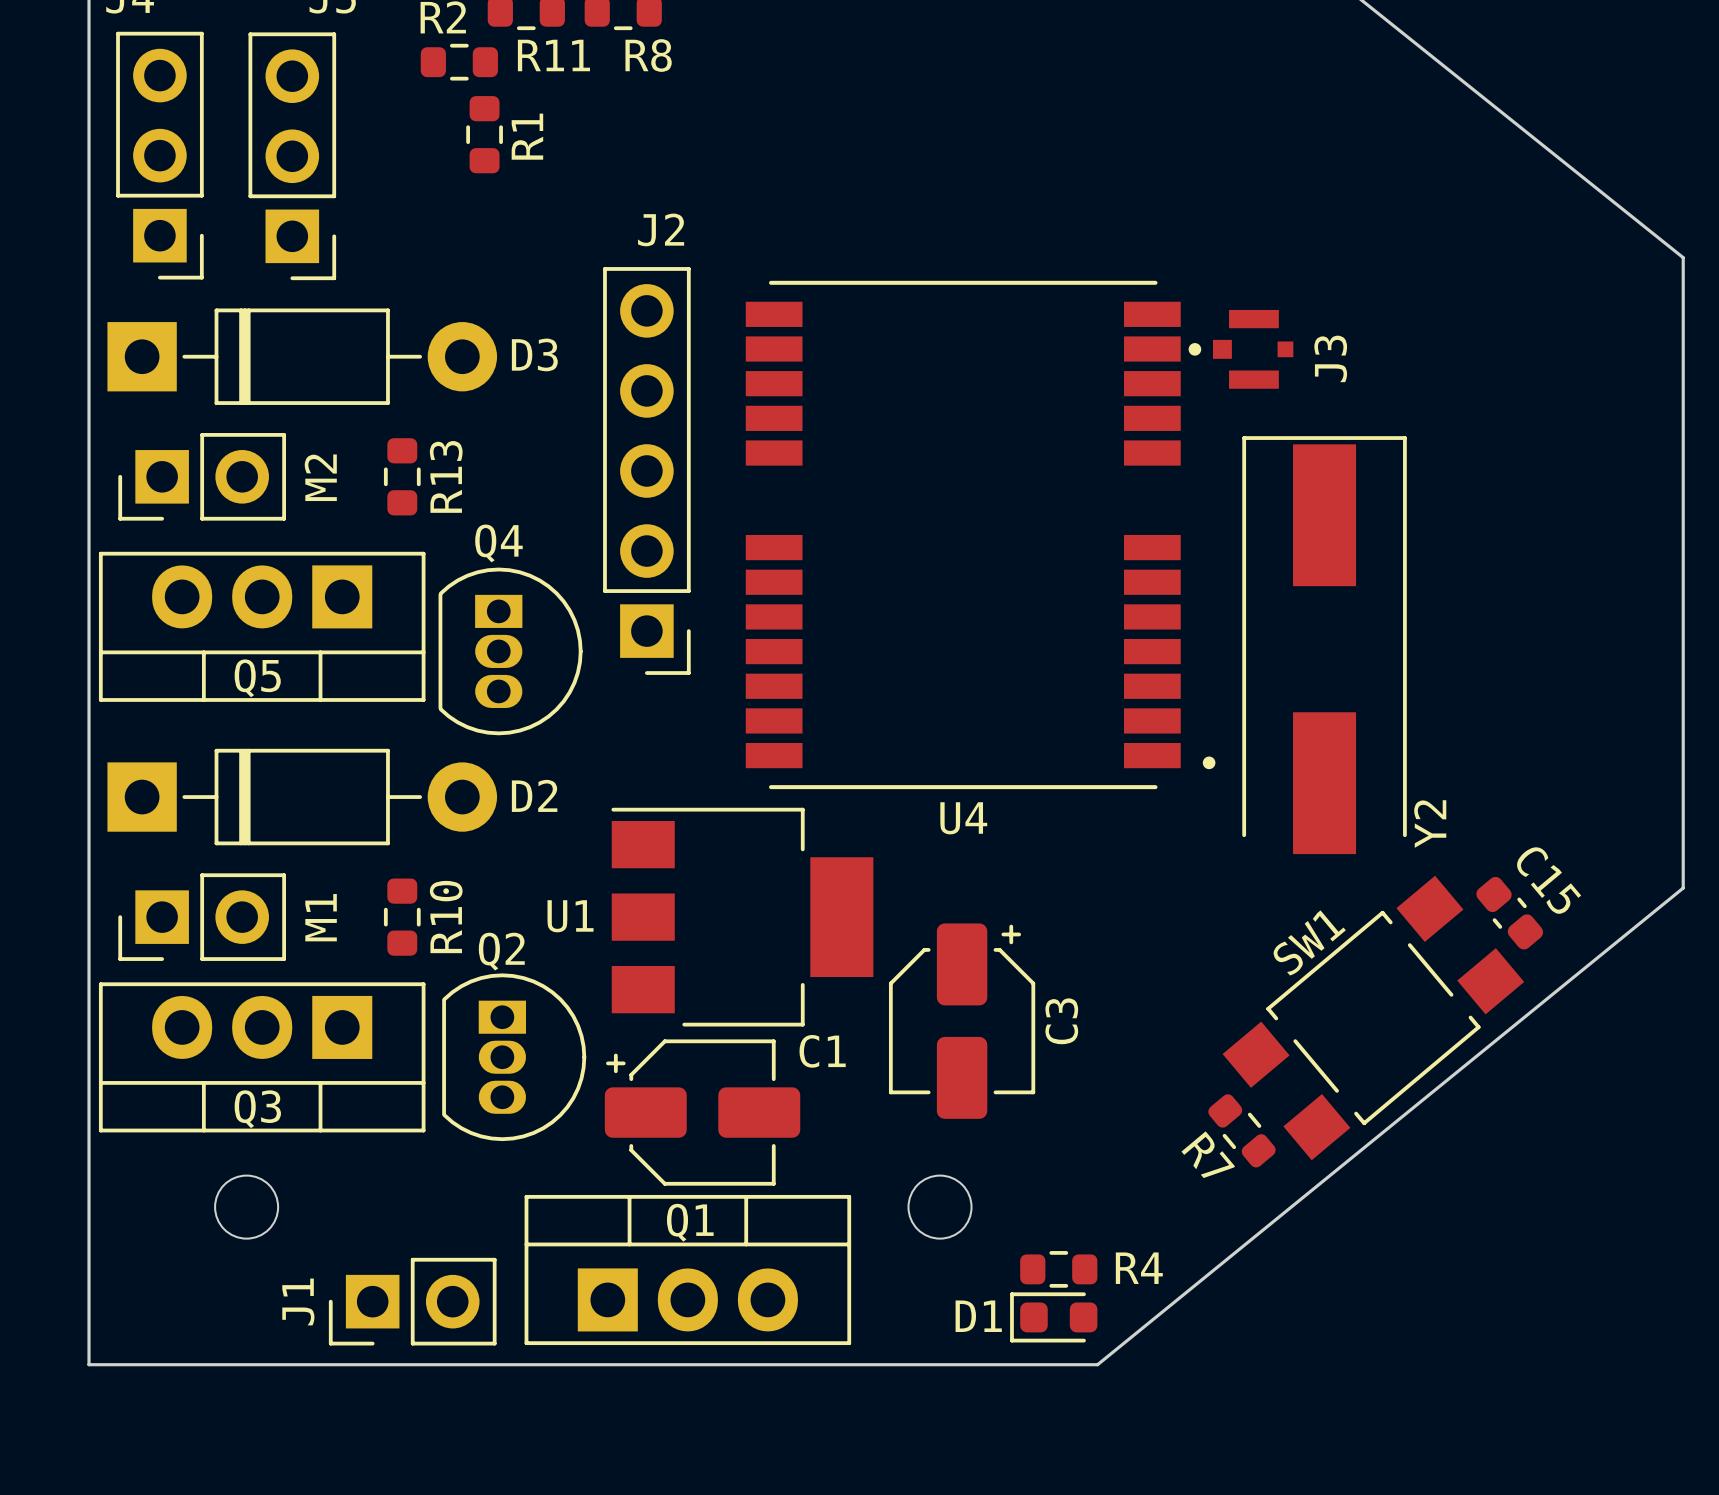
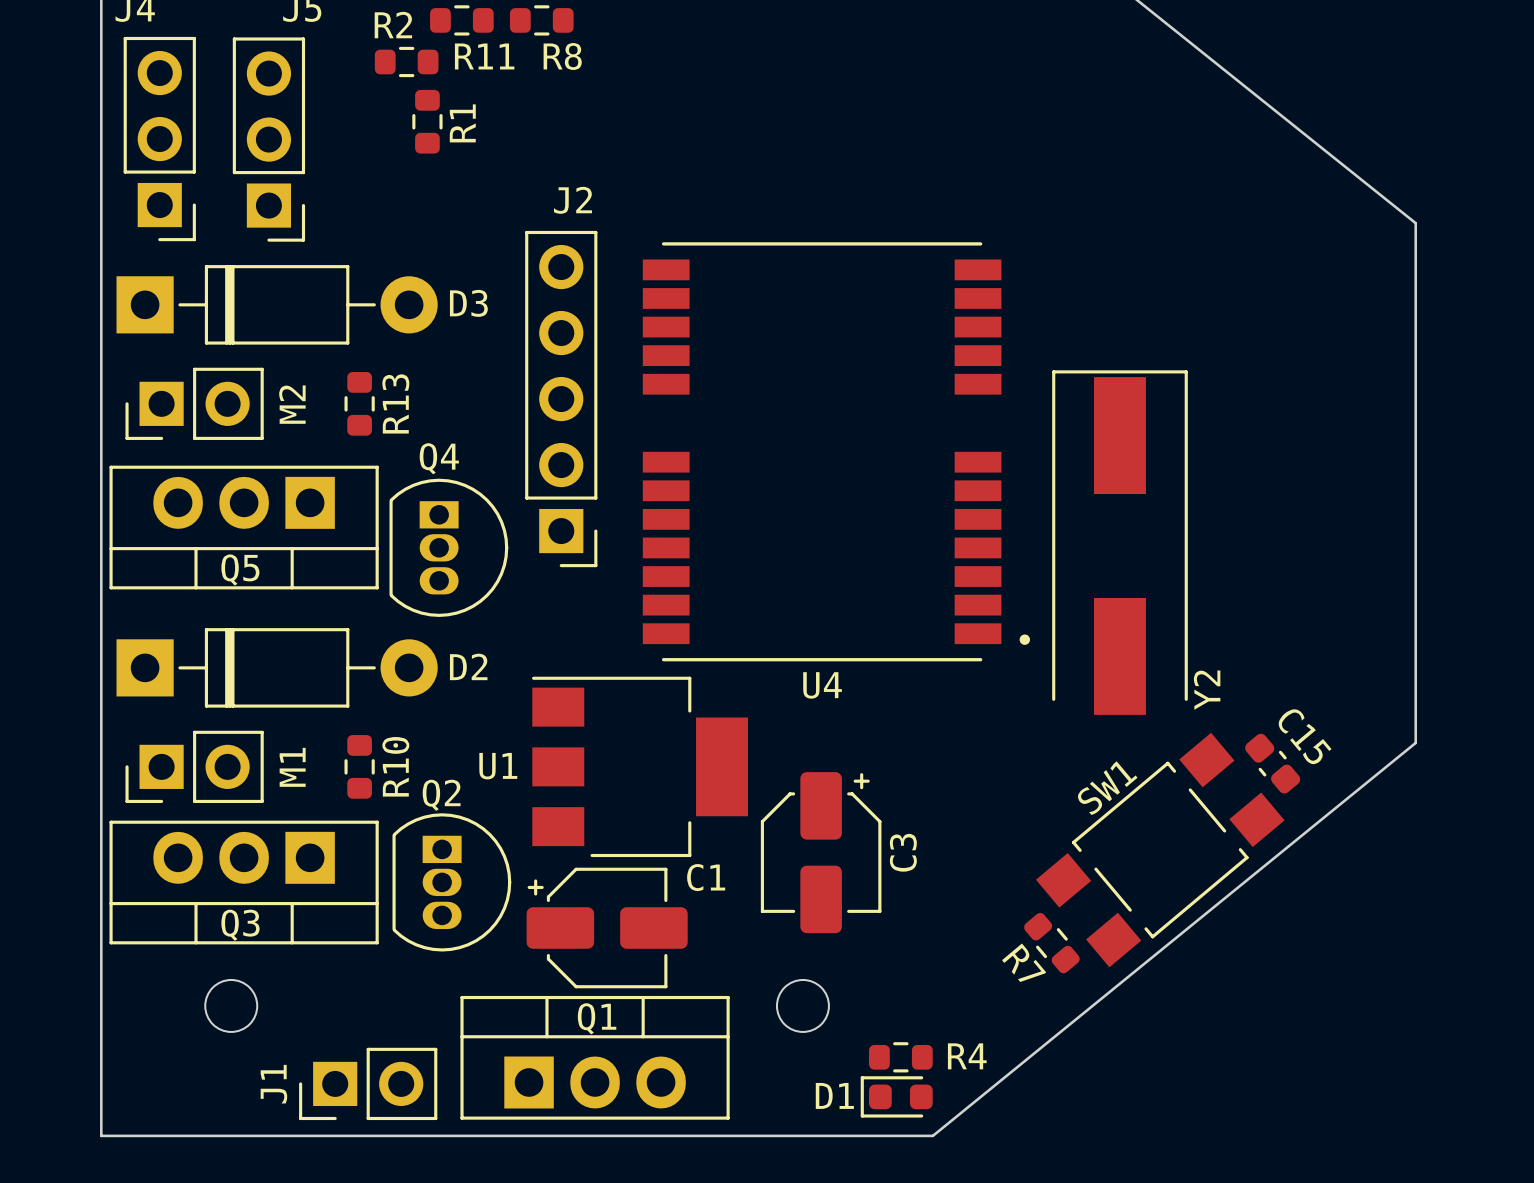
J3: (1240, 349) -> none

